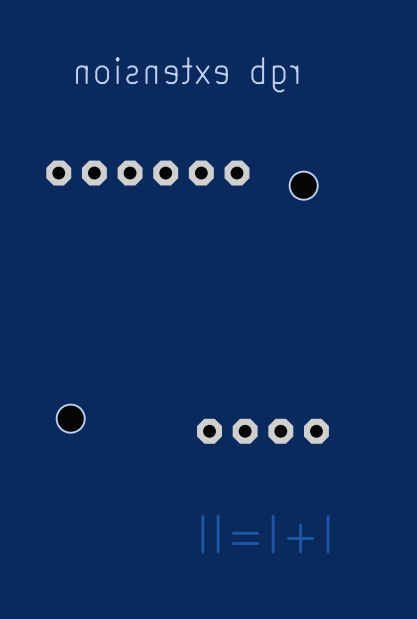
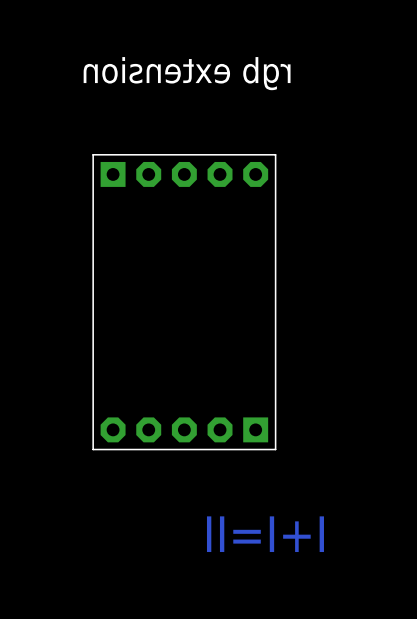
board edge: none -> (275, 154) (275, 449) (93, 449) (93, 154) (275, 154)
part: (147, 173) -> none
part: none -> (184, 174)
hole: (303, 185) -> none
hole: (70, 418) -> none
part: none -> (184, 429)
part: (262, 431) -> none

